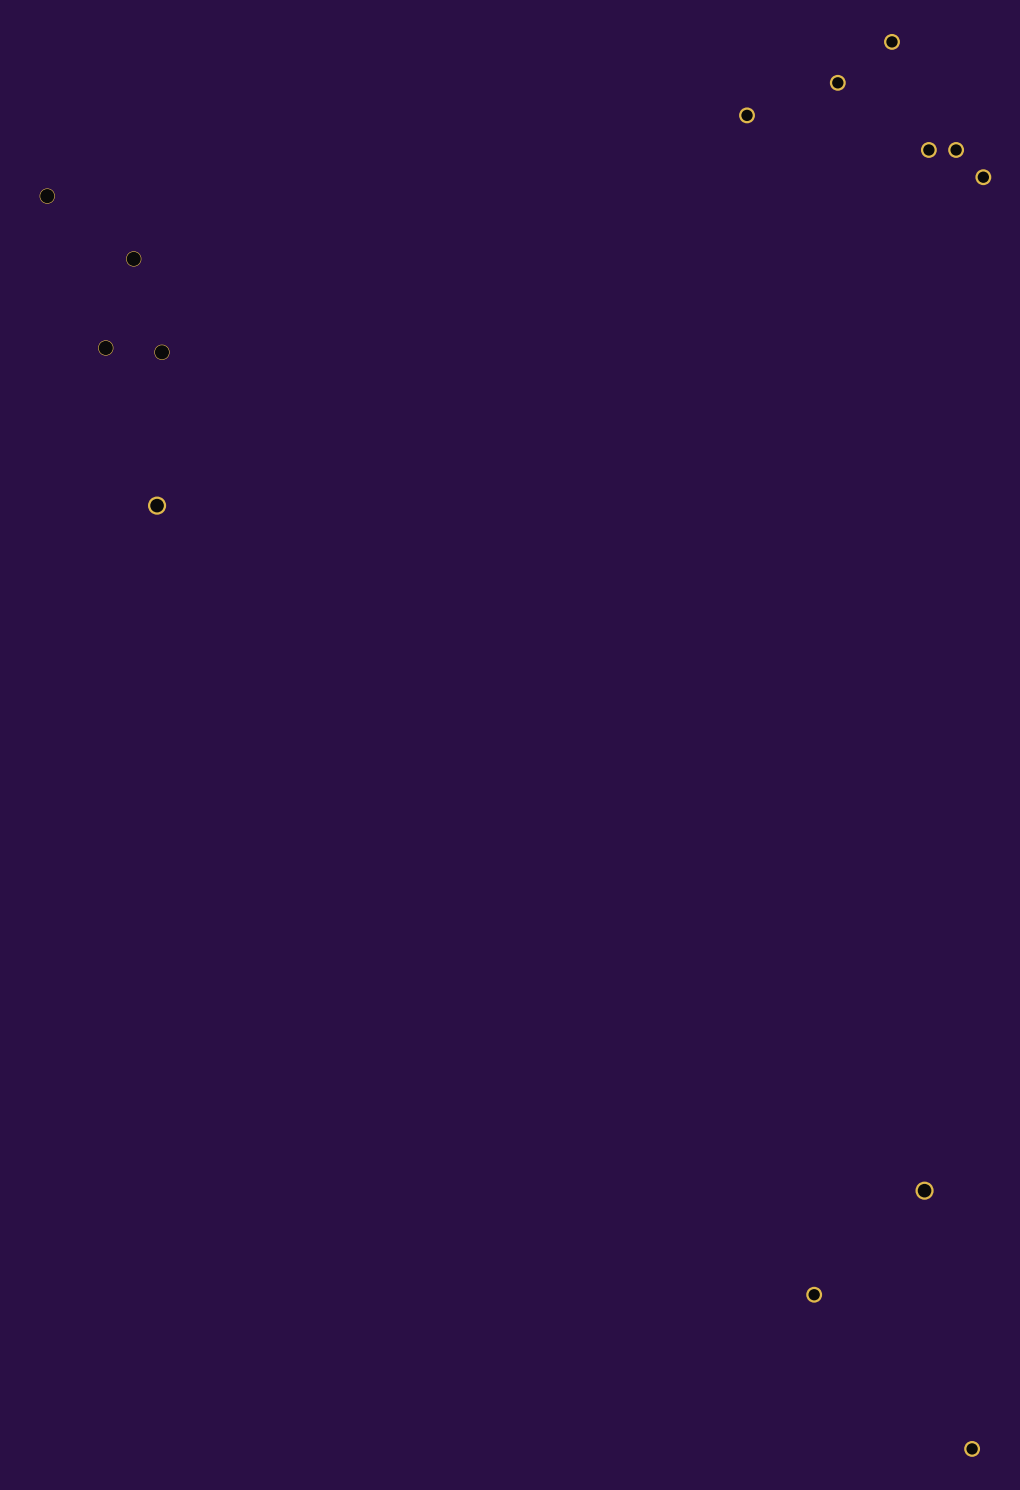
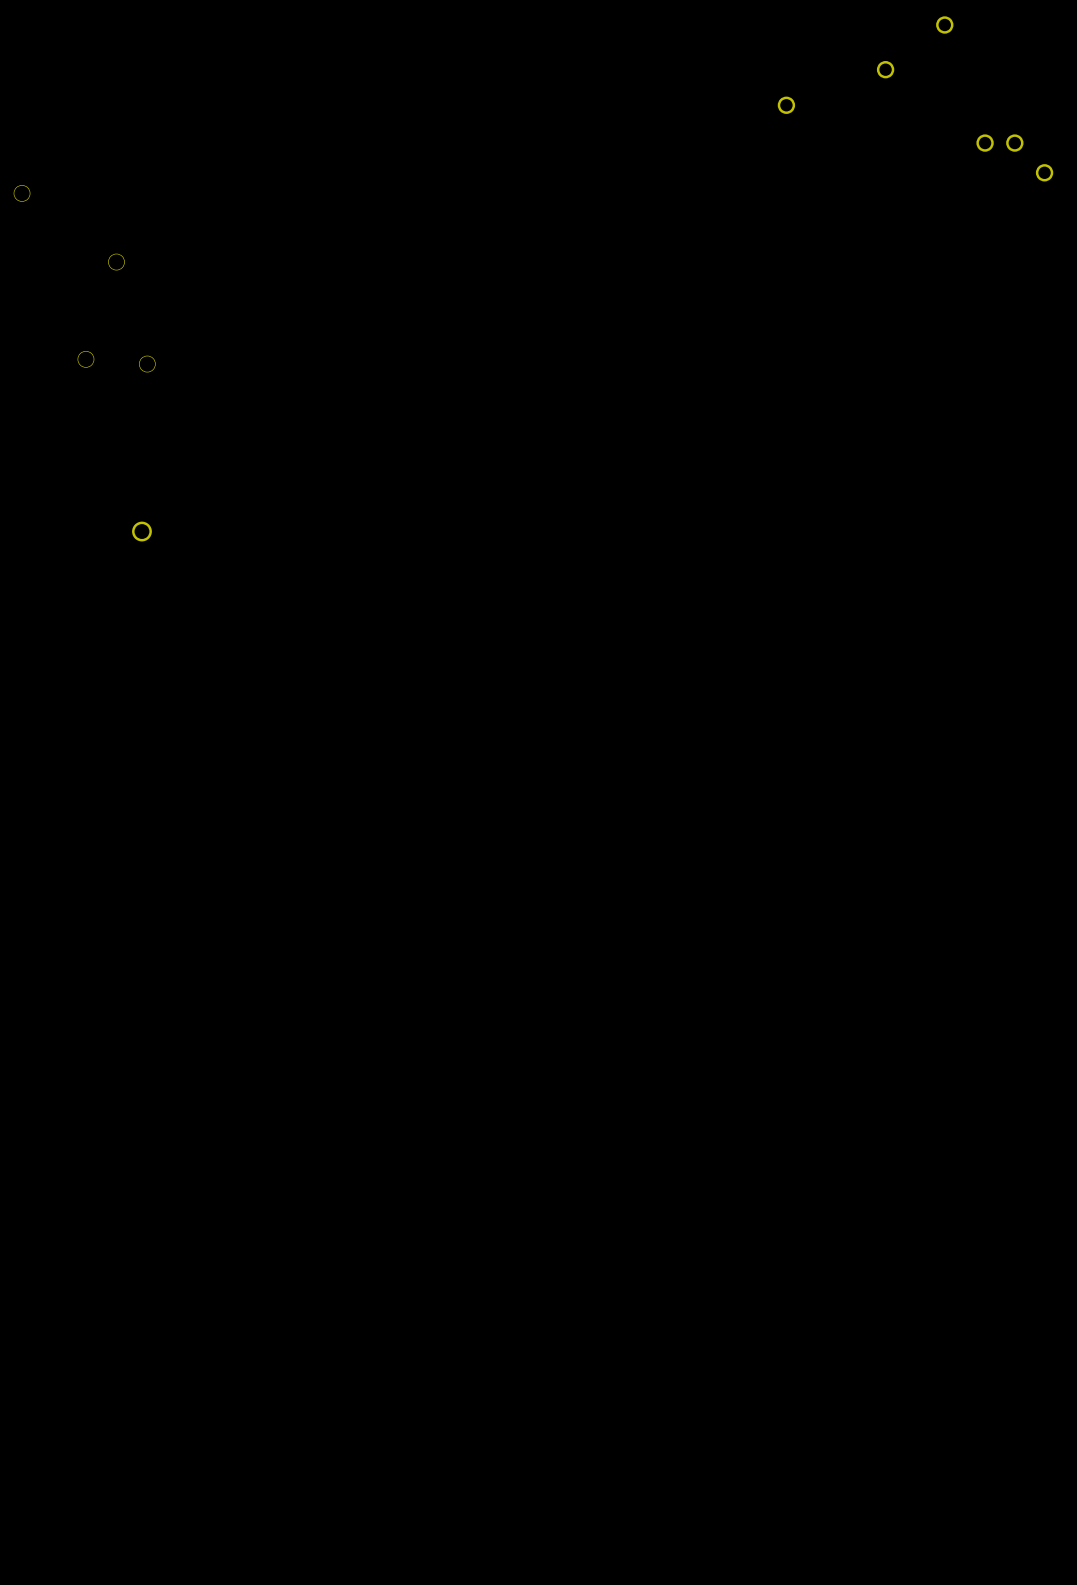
part: (924, 1190) -> none
part: (814, 1294) -> none
part: (972, 1448) -> none

